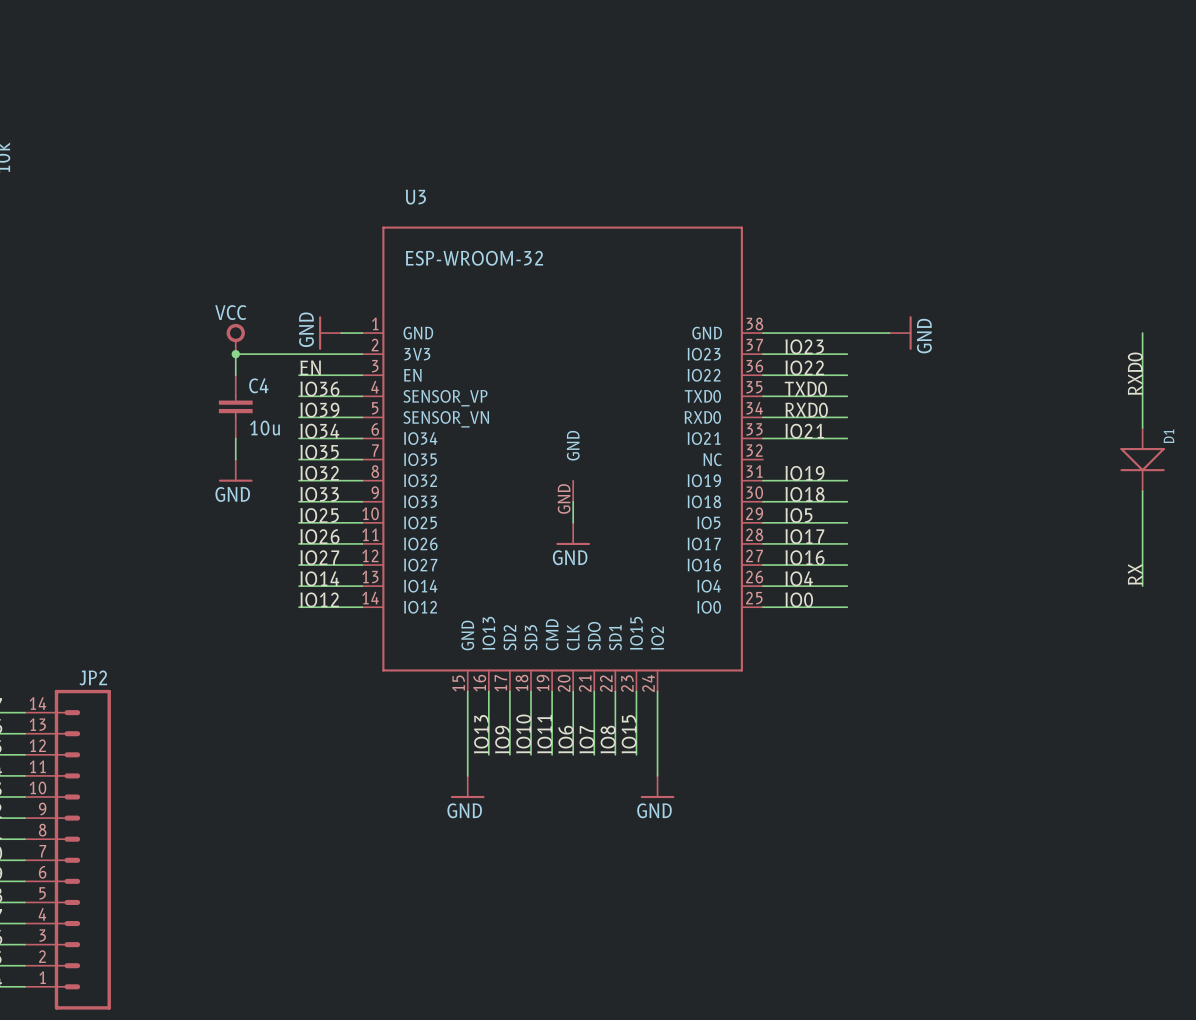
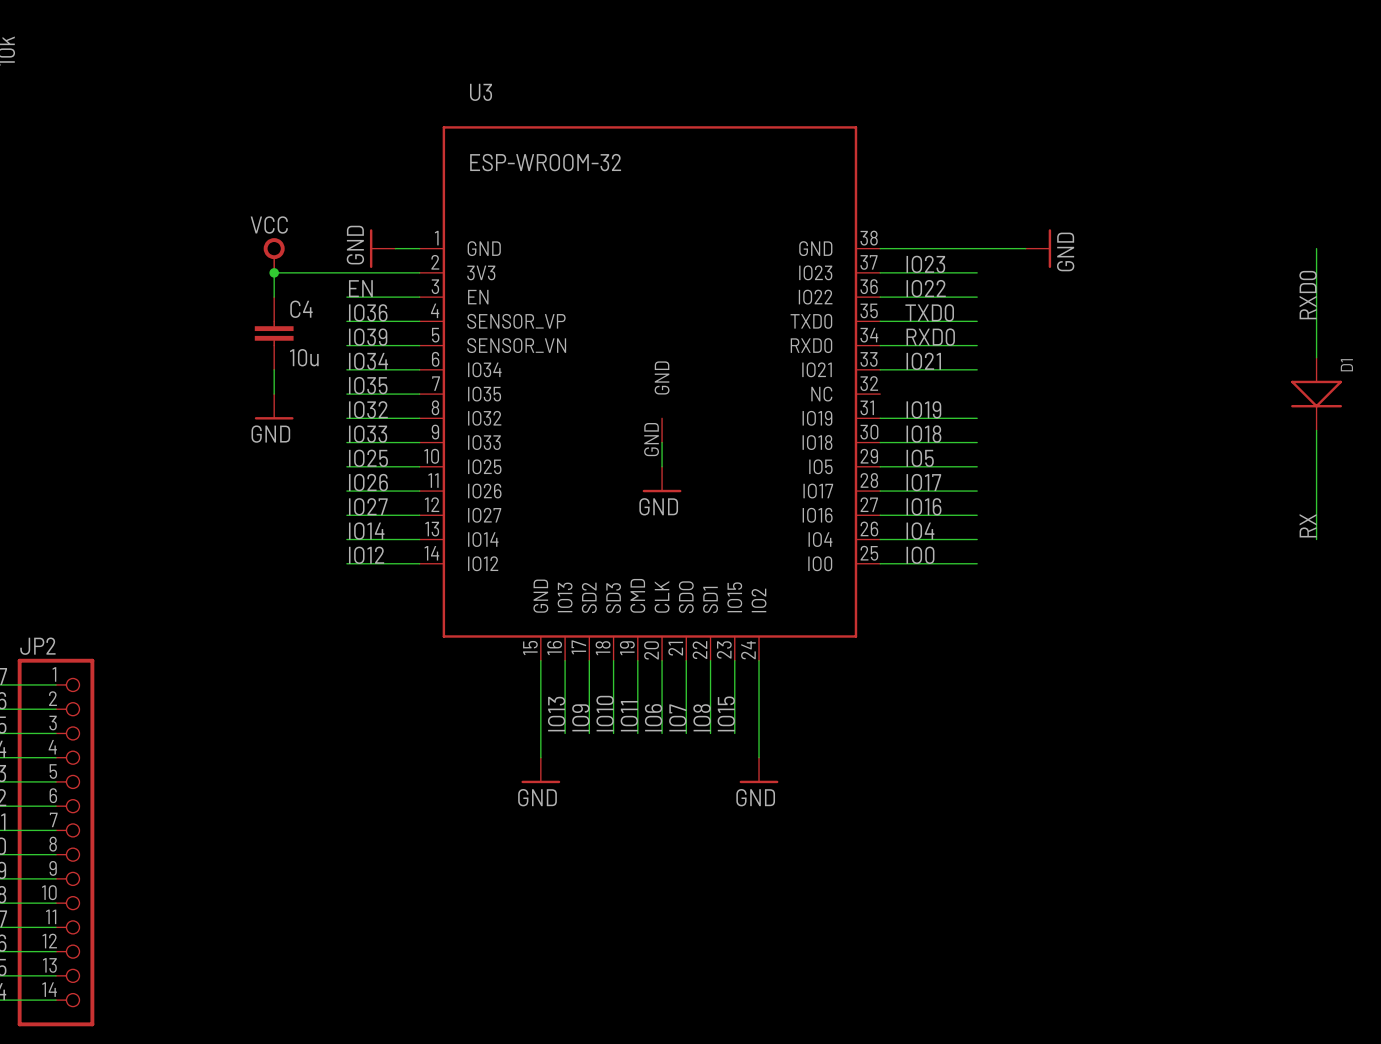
JP2 name position: JP2 (93, 677) -> JP2 (37, 646)
JP2 symbol: [24, 689, 111, 1010] -> [17, 658, 95, 1027]

